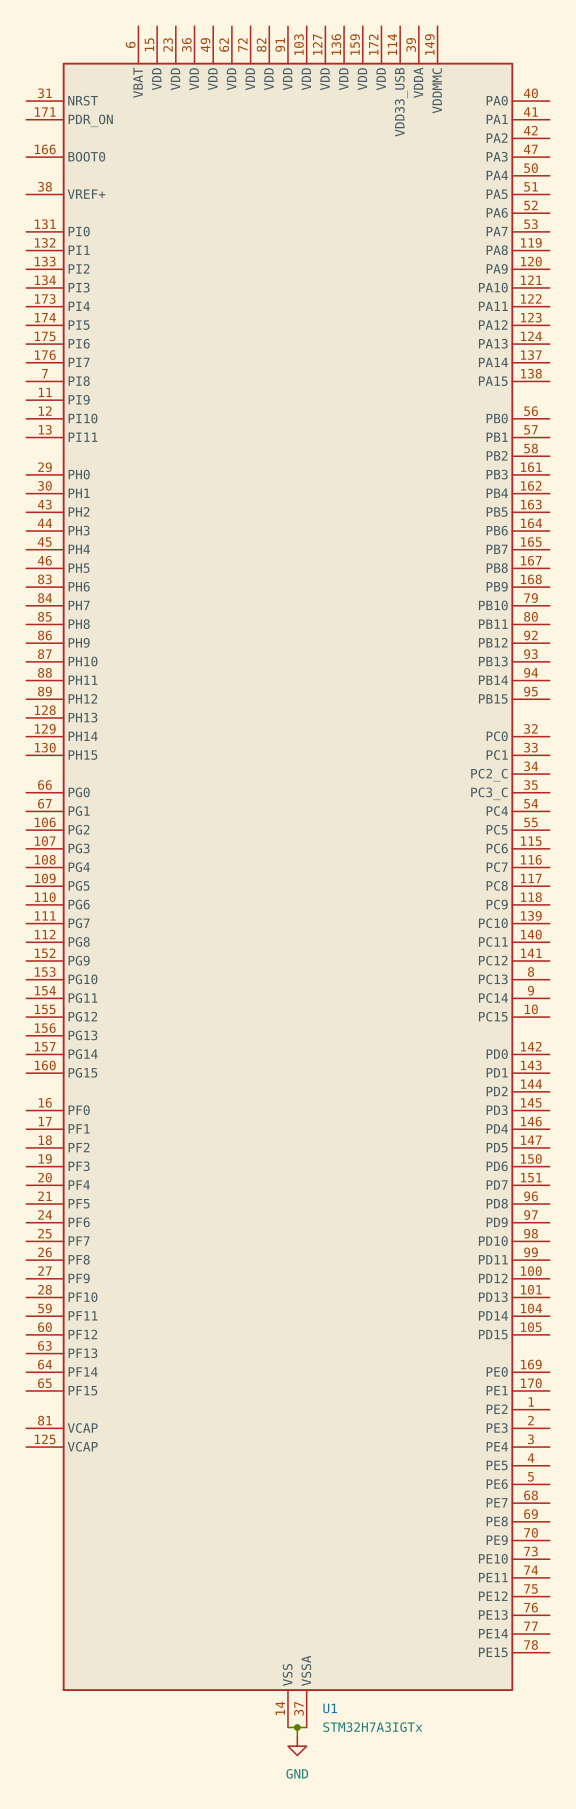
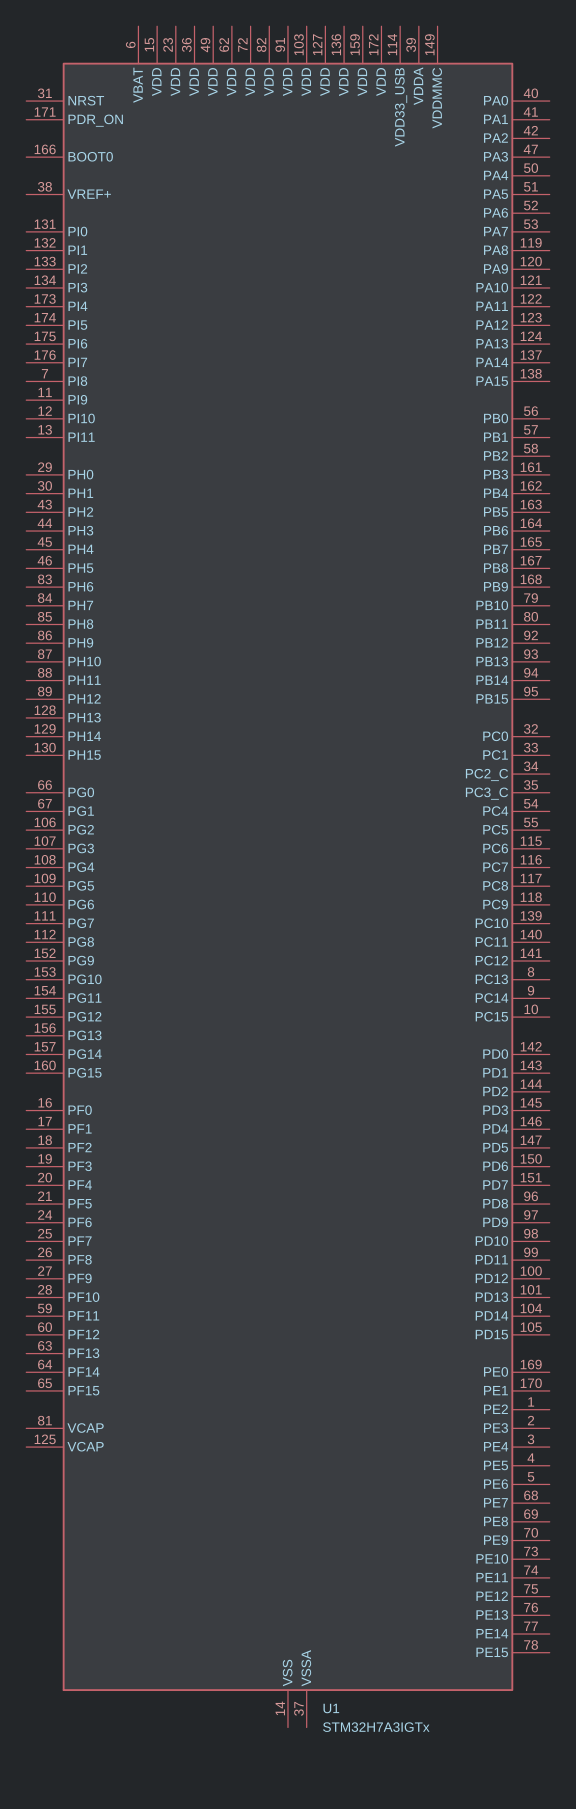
wire: (287, 1727) (306, 1727) -> none
wire: (297, 1727) (297, 1736) -> none
junction: (297, 1727) -> none
power symbol: GND (297, 1746) -> none

